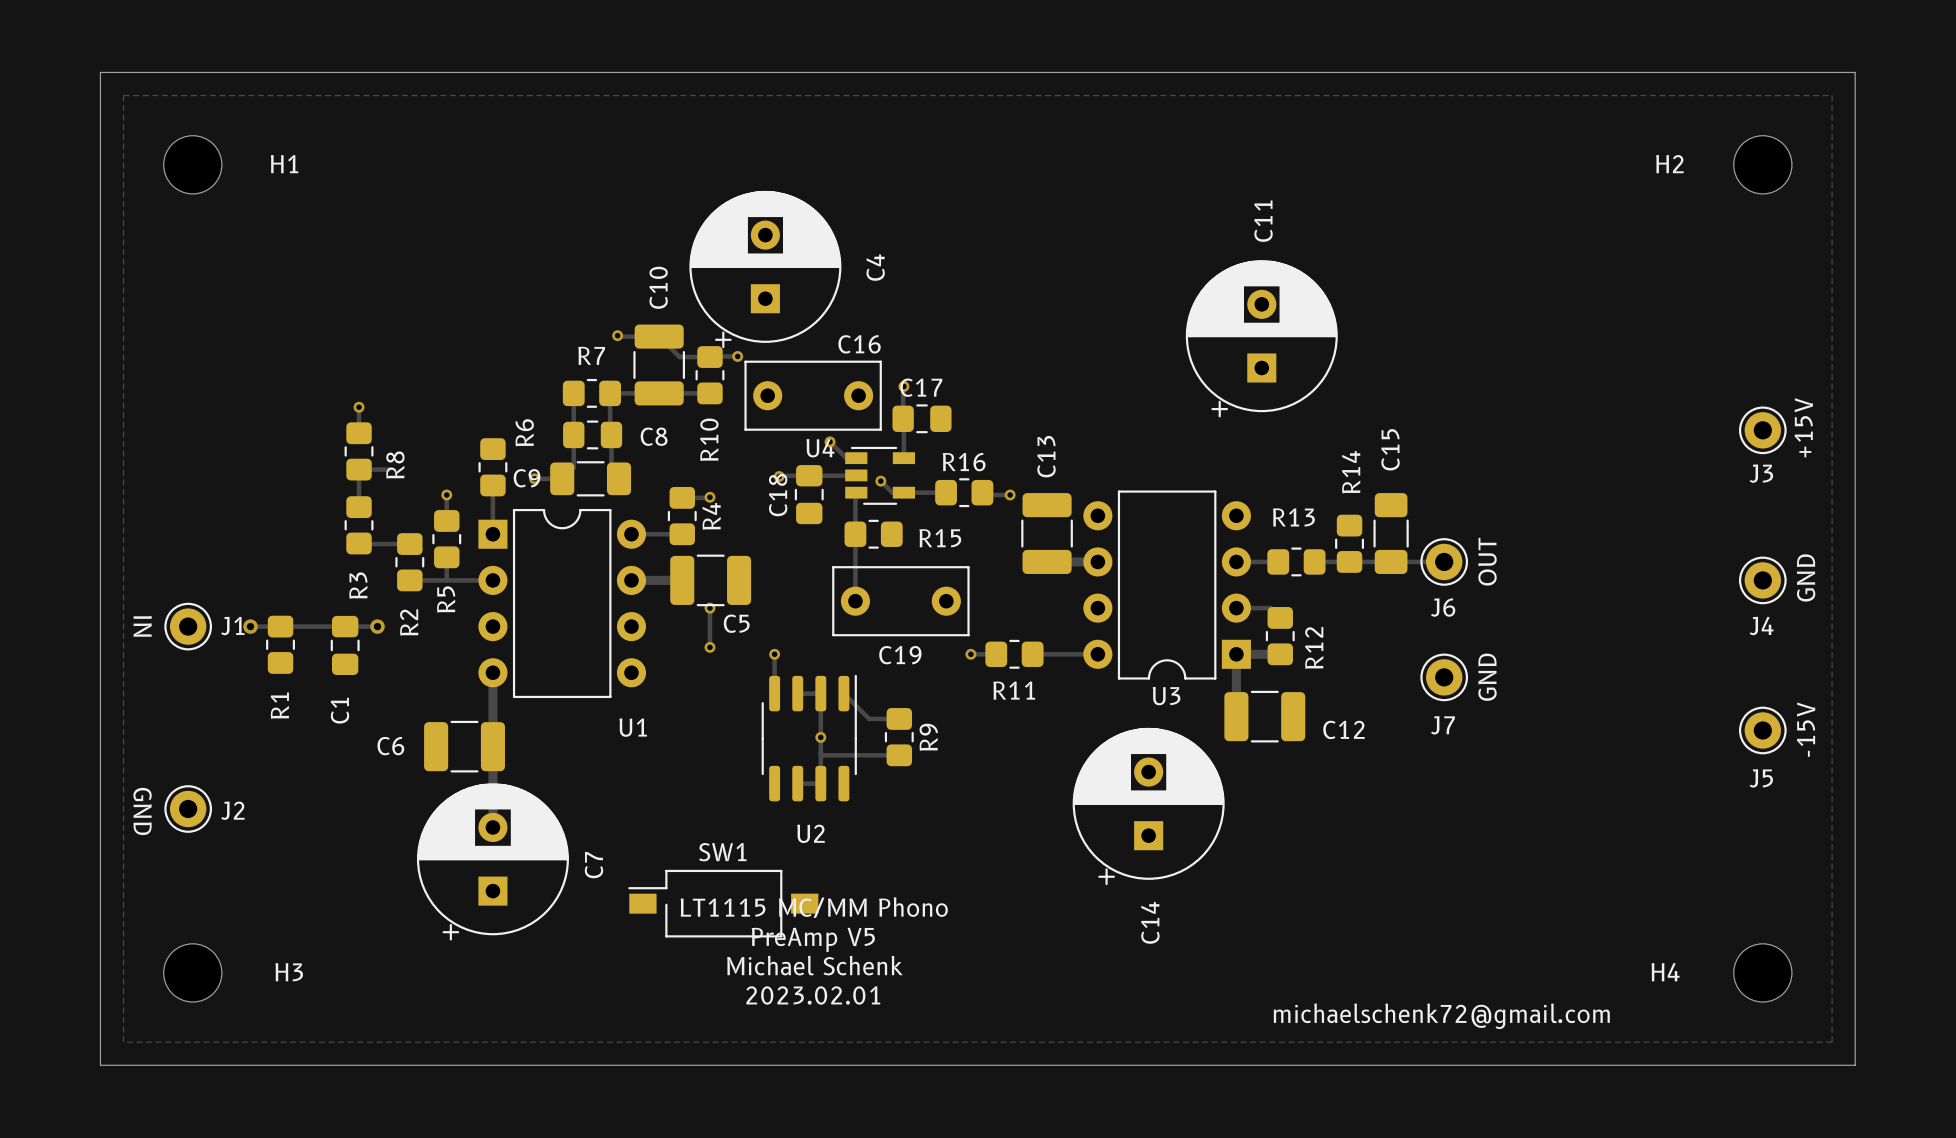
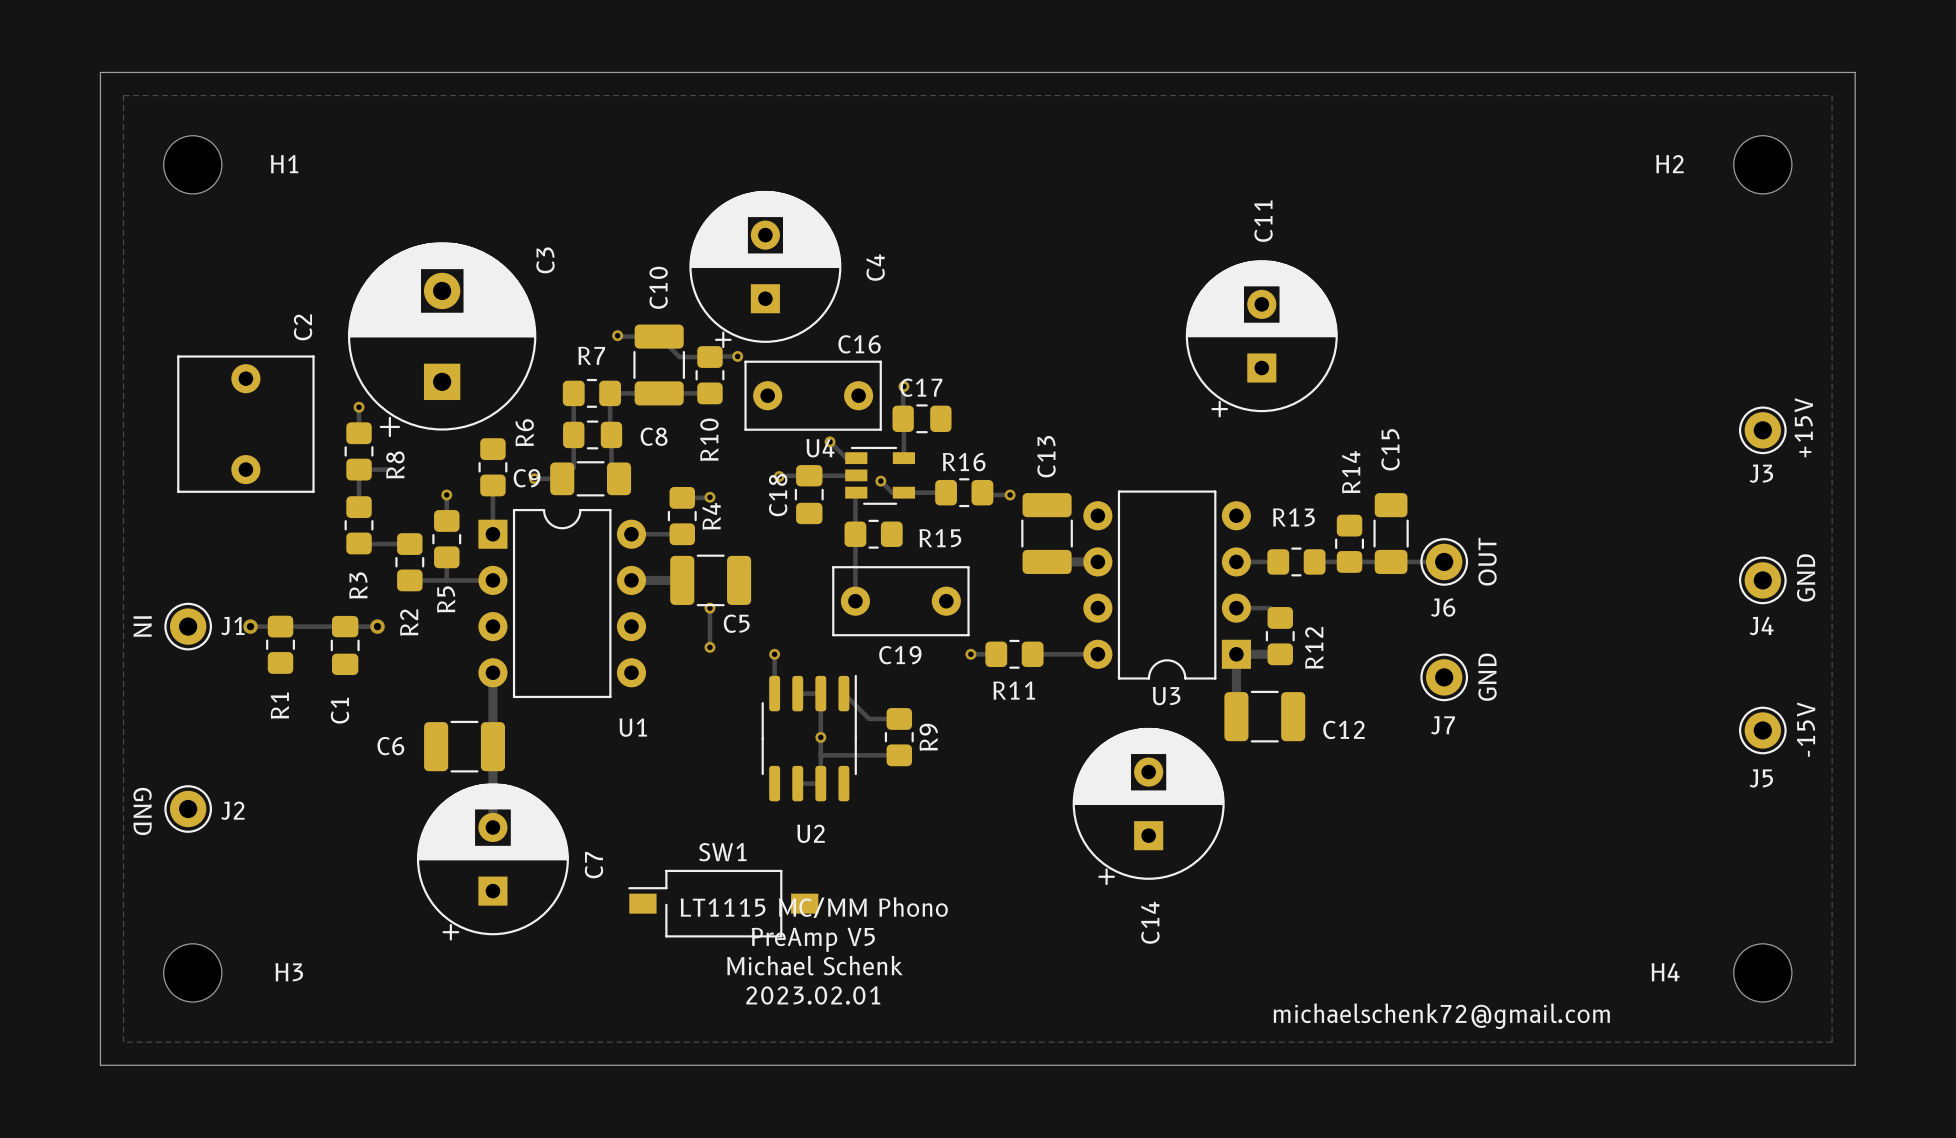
C3: none -> (442, 339)
C2: none -> (245, 424)

